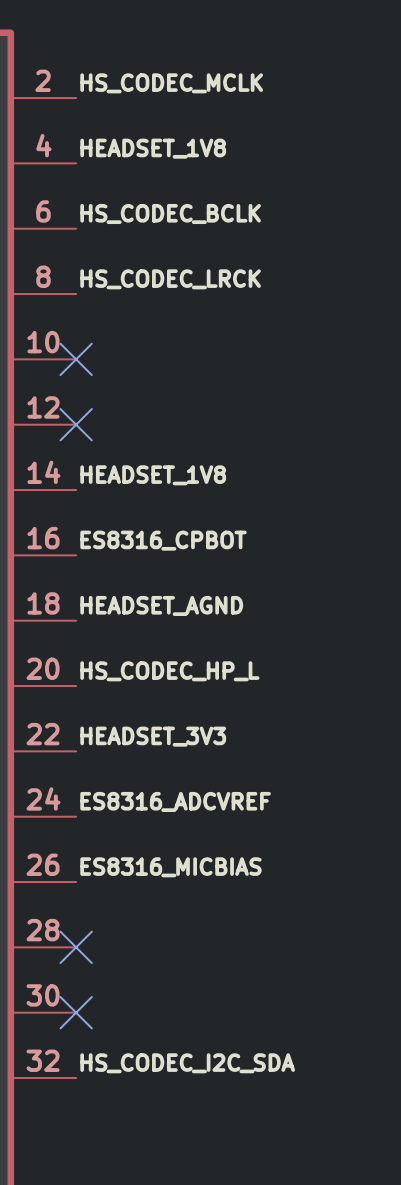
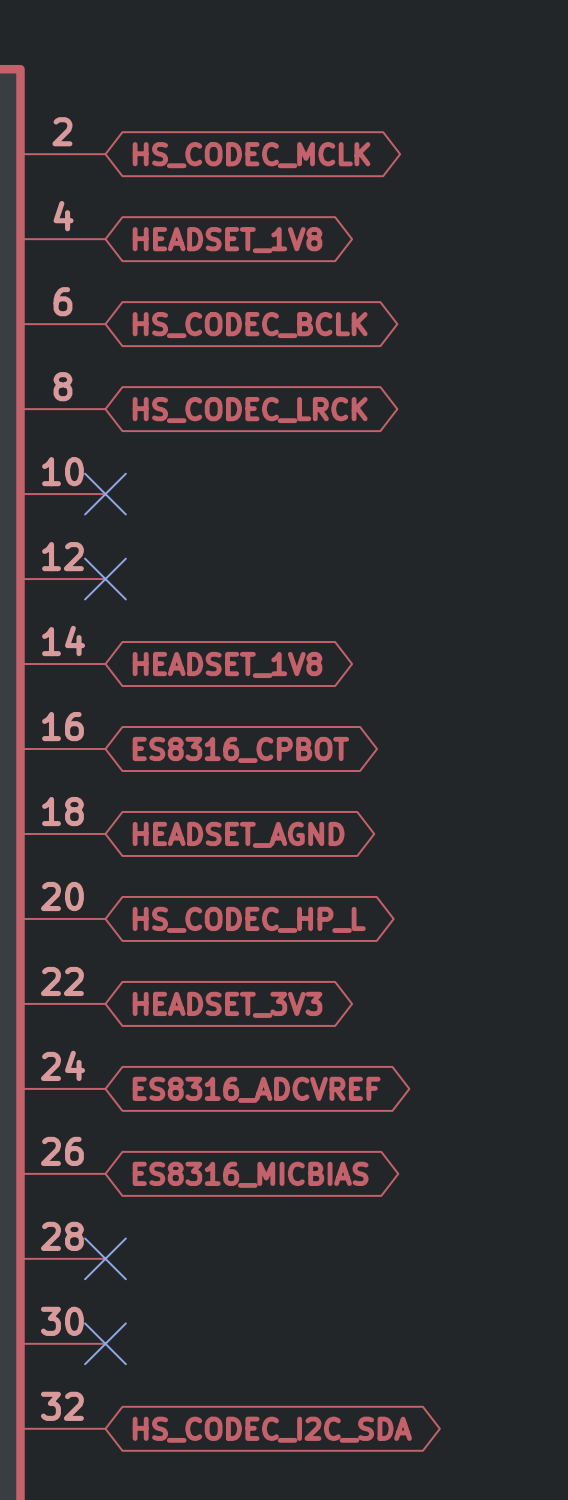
label: HS_CODEC_MCLK (171, 83) -> none
global label: none -> HS_CODEC_MCLK (251, 155)
label: HEADSET_1V8 (153, 148) -> none
global label: none -> HEADSET_1V8 (227, 240)
label: HS_CODEC_BCLK (170, 213) -> none
global label: none -> HS_CODEC_BCLK (250, 325)
label: HS_CODEC_LRCK (170, 279) -> none
global label: none -> HS_CODEC_LRCK (250, 410)
label: HEADSET_1V8 (153, 475) -> none
global label: none -> HEADSET_1V8 (227, 664)
label: ES8316_CPBOT (163, 540) -> none
global label: none -> ES8316_CPBOT (240, 749)
label: HEADSET_AGND (161, 605) -> none
global label: none -> HEADSET_AGND (238, 834)
label: HS_CODEC_HP_L (169, 671) -> none
global label: none -> HS_CODEC_HP_L (249, 919)
label: HEADSET_3V3 (153, 736) -> none
global label: none -> HEADSET_3V3 (227, 1004)
label: ES8316_ADCVREF (175, 801) -> none
global label: none -> ES8316_ADCVREF (256, 1089)
label: ES8316_MICBIAS (170, 867) -> none
global label: none -> ES8316_MICBIAS (250, 1174)
label: HS_CODEC_I2C_SDA (187, 1063) -> none
global label: none -> HS_CODEC_I2C_SDA (272, 1429)

